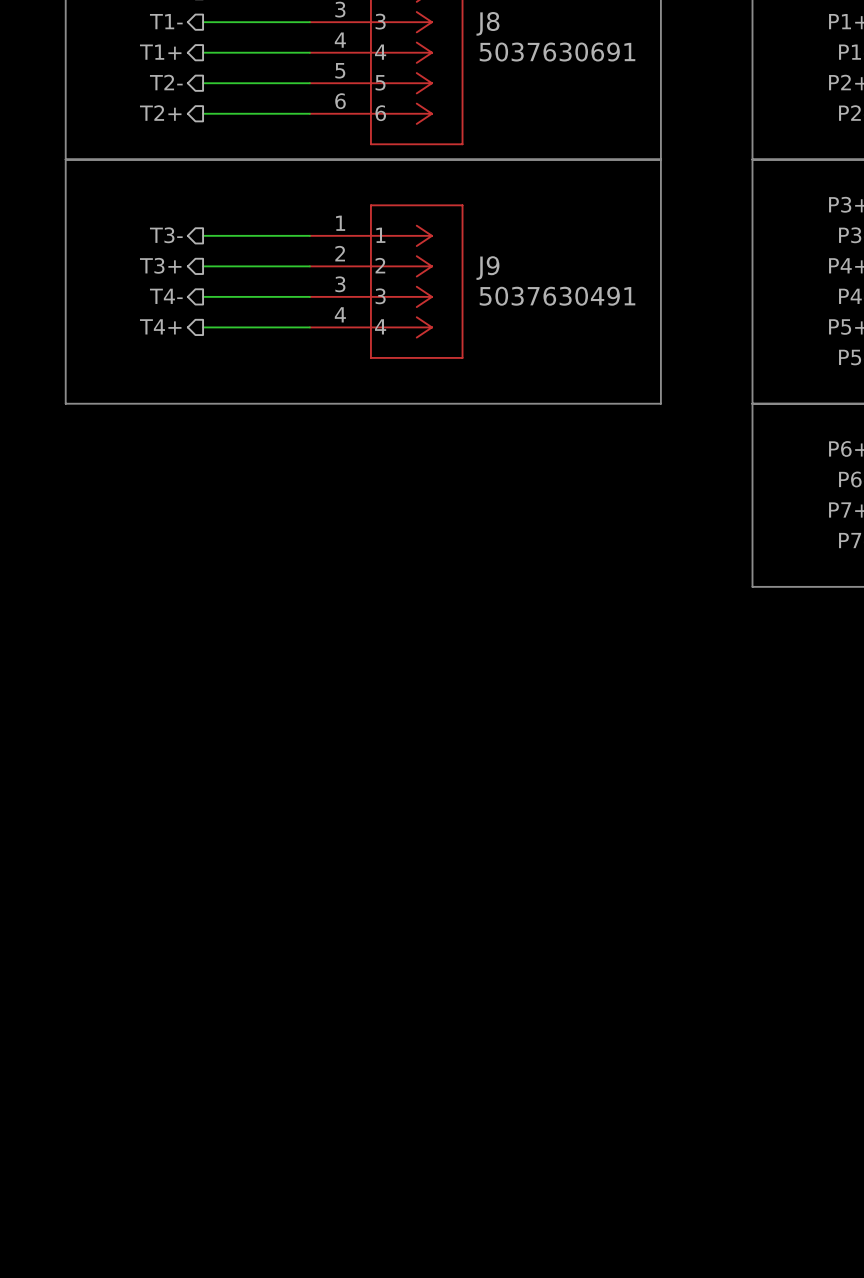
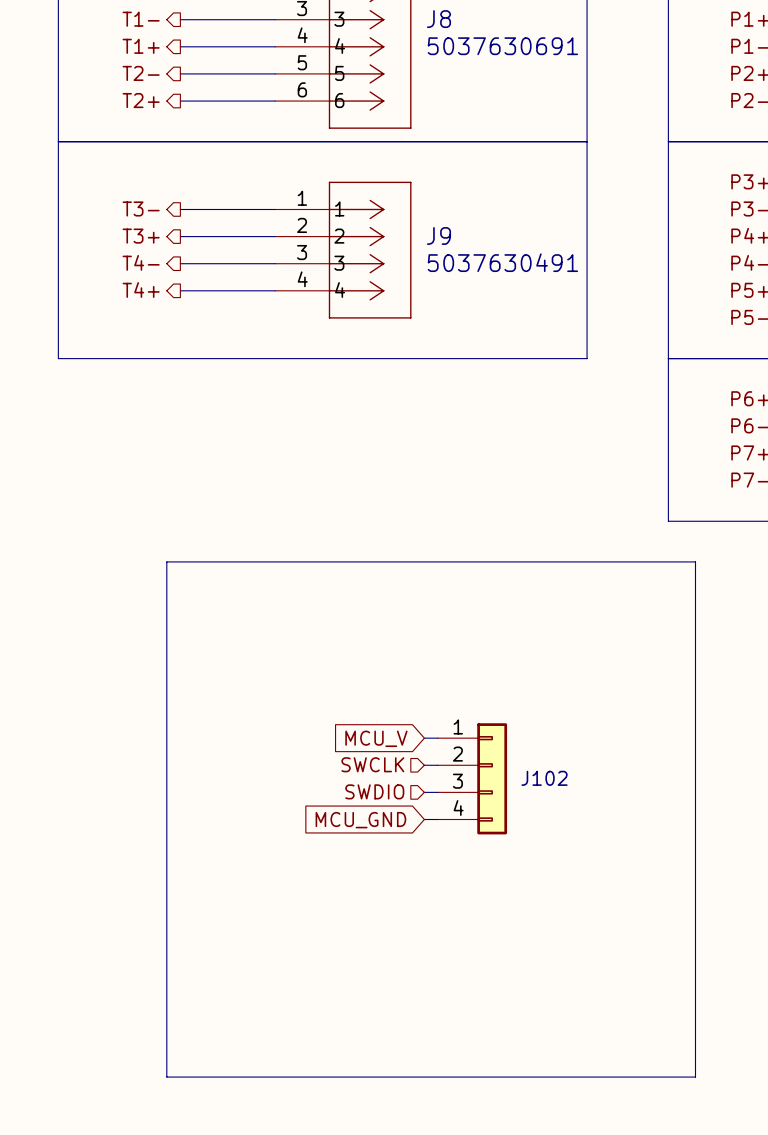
line: none -> (166, 561) (695, 561) (695, 1077) (166, 1077) (166, 561)
wire: none -> (424, 738) (437, 738)
global label: none -> MCU_V (376, 738)
hierarchical label: none -> SWCLK (372, 764)
wire: none -> (424, 765) (437, 765)
J102: none -> (472, 778)
hierarchical label: none -> SWDIO (374, 791)
wire: none -> (424, 792) (437, 792)
wire: none -> (424, 819) (437, 819)
global label: none -> MCU_GND (360, 820)

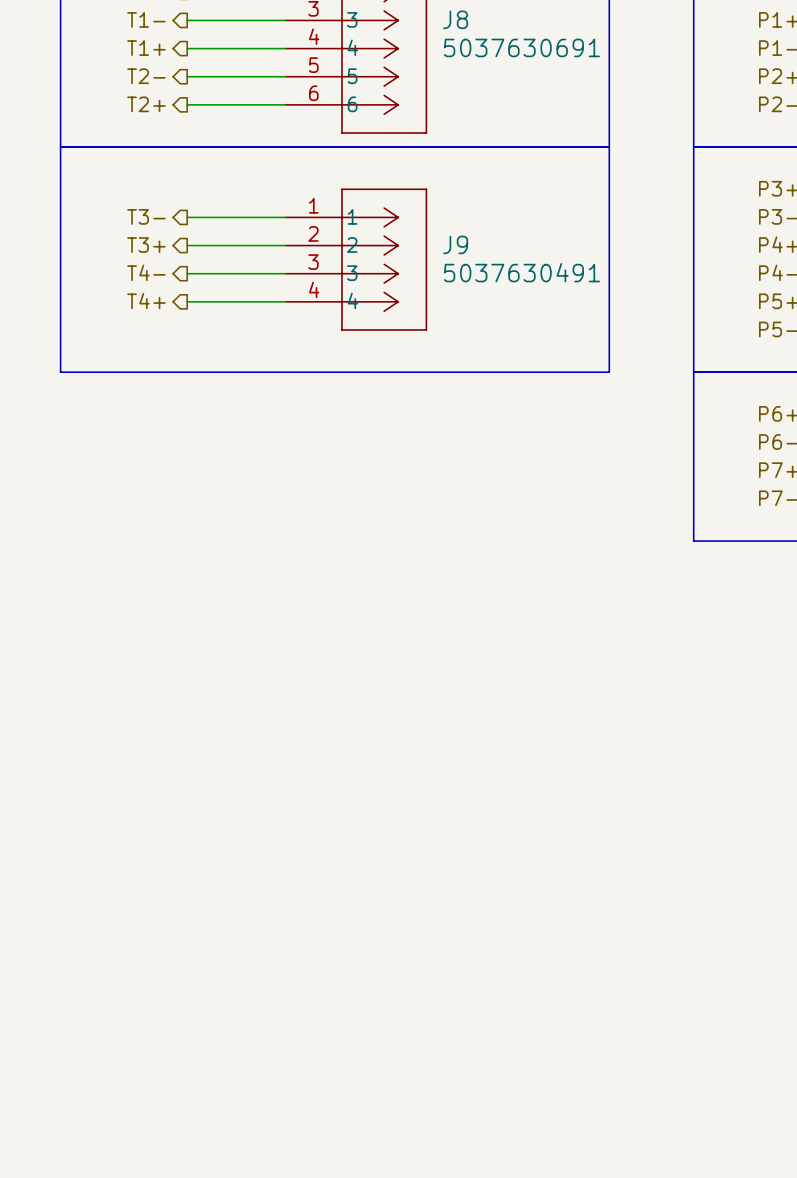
line: (166, 561) (695, 561) (695, 1077) (166, 1077) (166, 561) -> none
global label: MCU_V (376, 738) -> none
wire: (424, 738) (437, 738) -> none
hierarchical label: SWCLK (372, 764) -> none
wire: (424, 765) (437, 765) -> none
J102: (472, 778) -> none
hierarchical label: SWDIO (374, 791) -> none
wire: (424, 792) (437, 792) -> none
wire: (424, 819) (437, 819) -> none
global label: MCU_GND (360, 820) -> none

